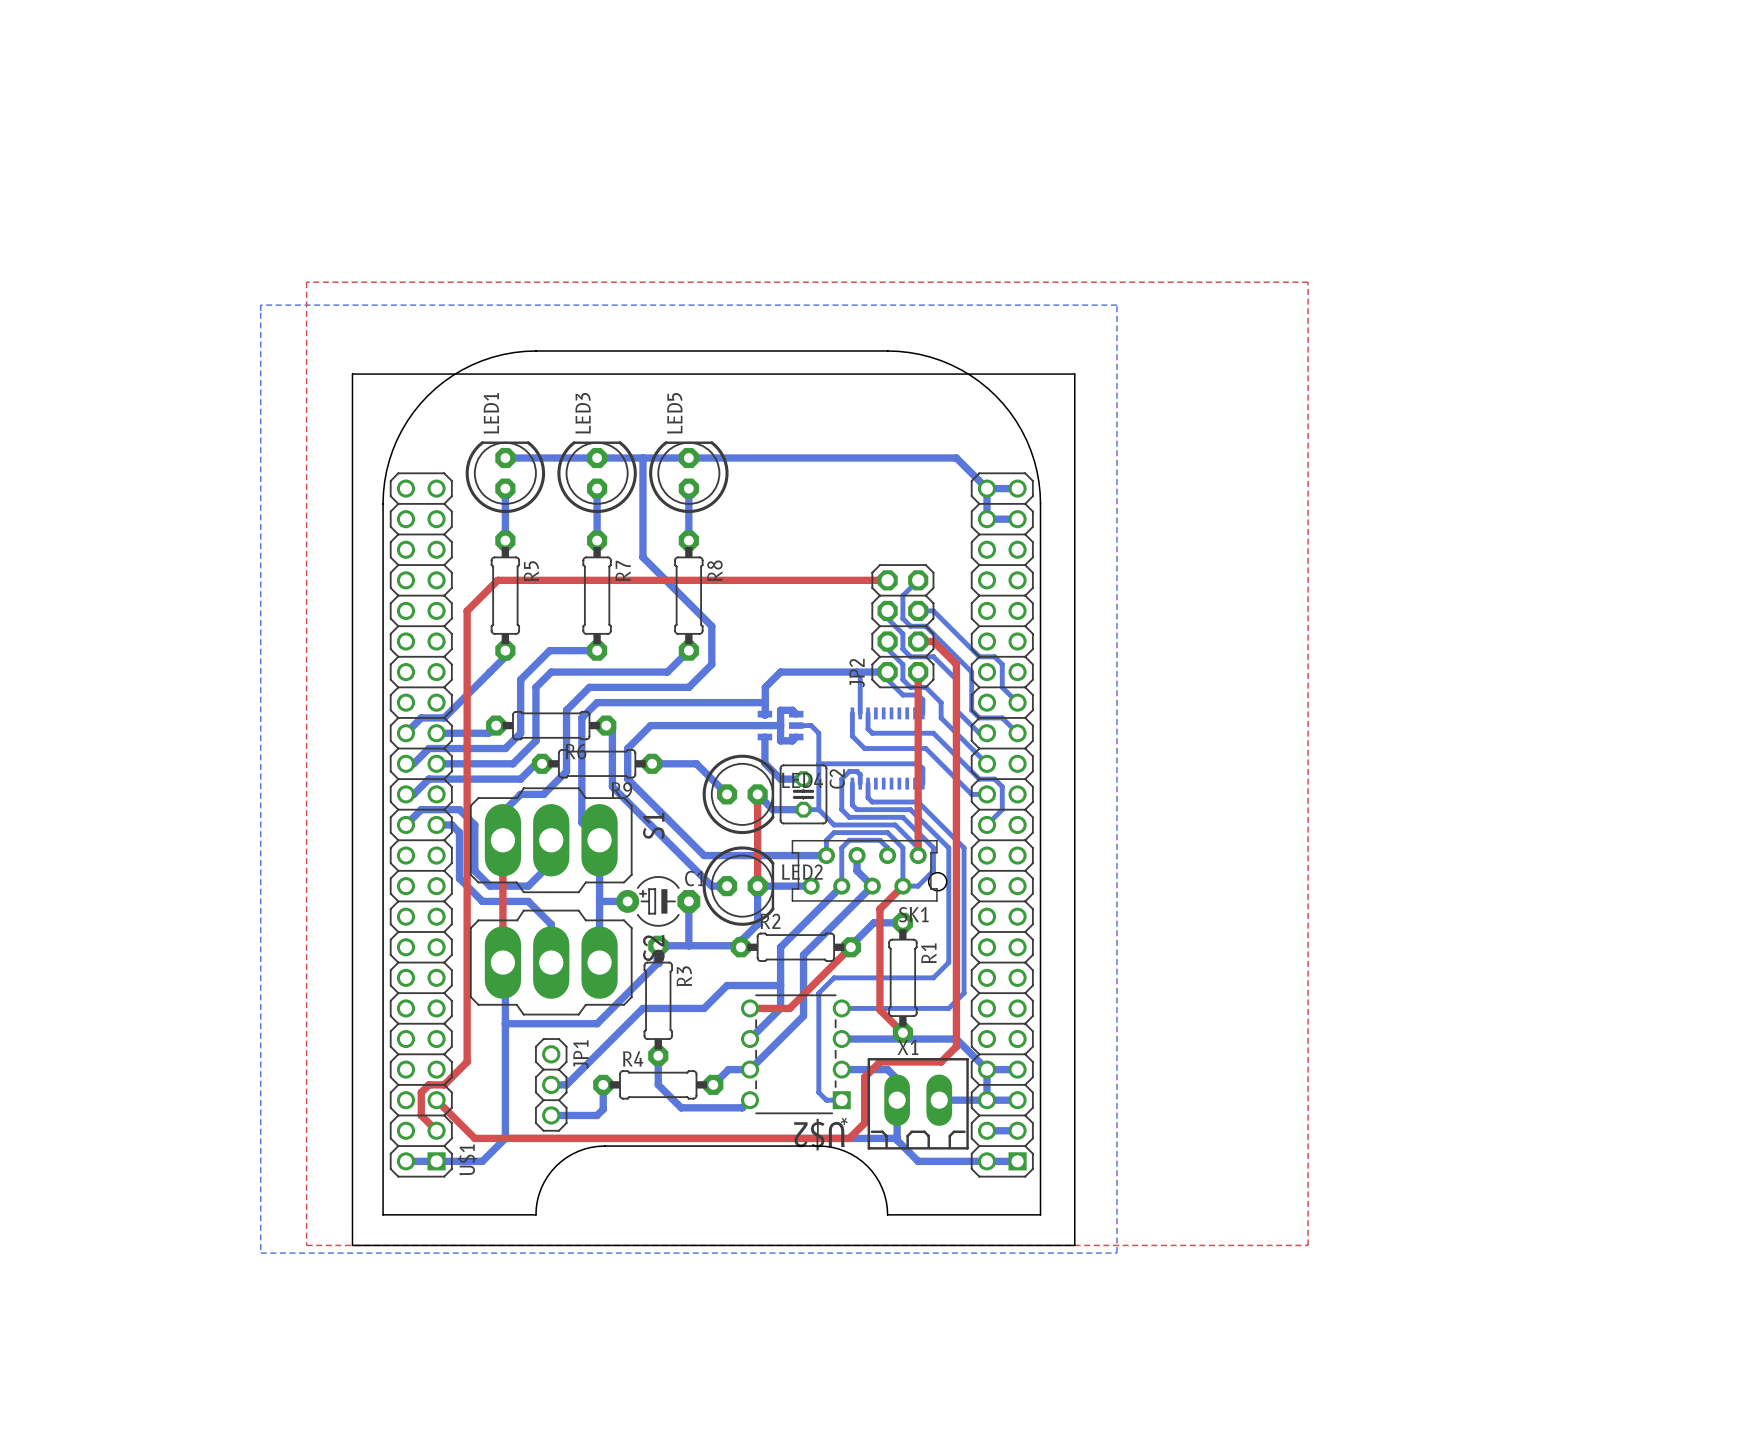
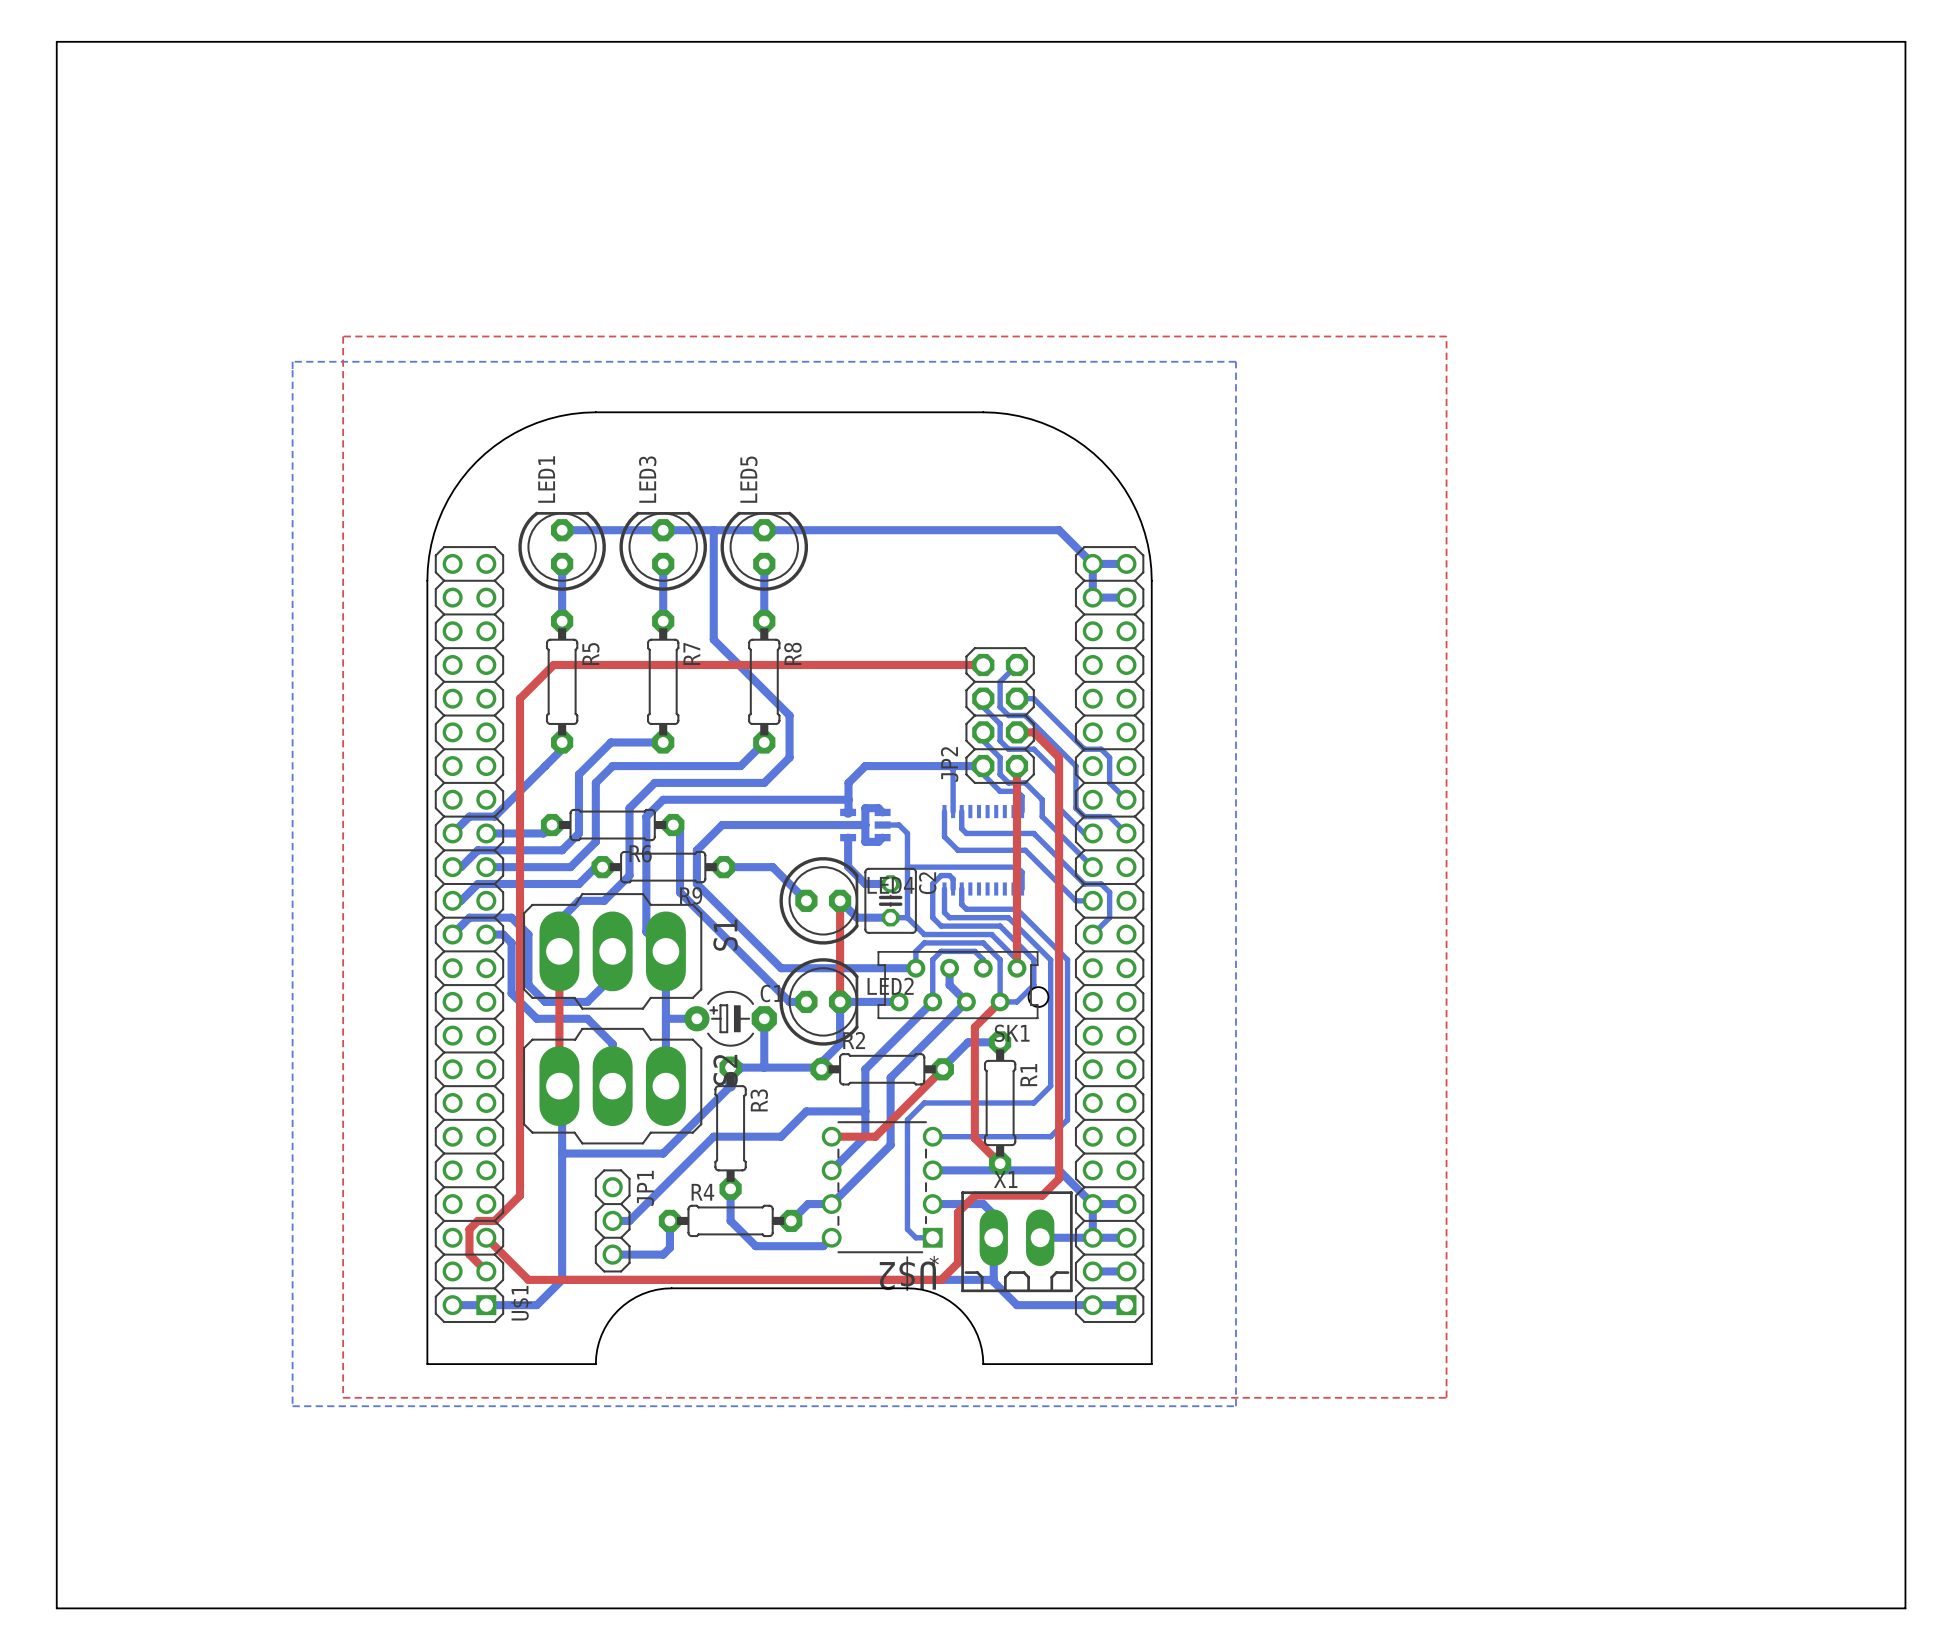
board edge: none -> (56, 41) (1905, 41) (1905, 1608) (56, 1608) (56, 41)
board edge: (352, 374) (1074, 374) (1074, 1245) (352, 1245) (352, 374) -> none

